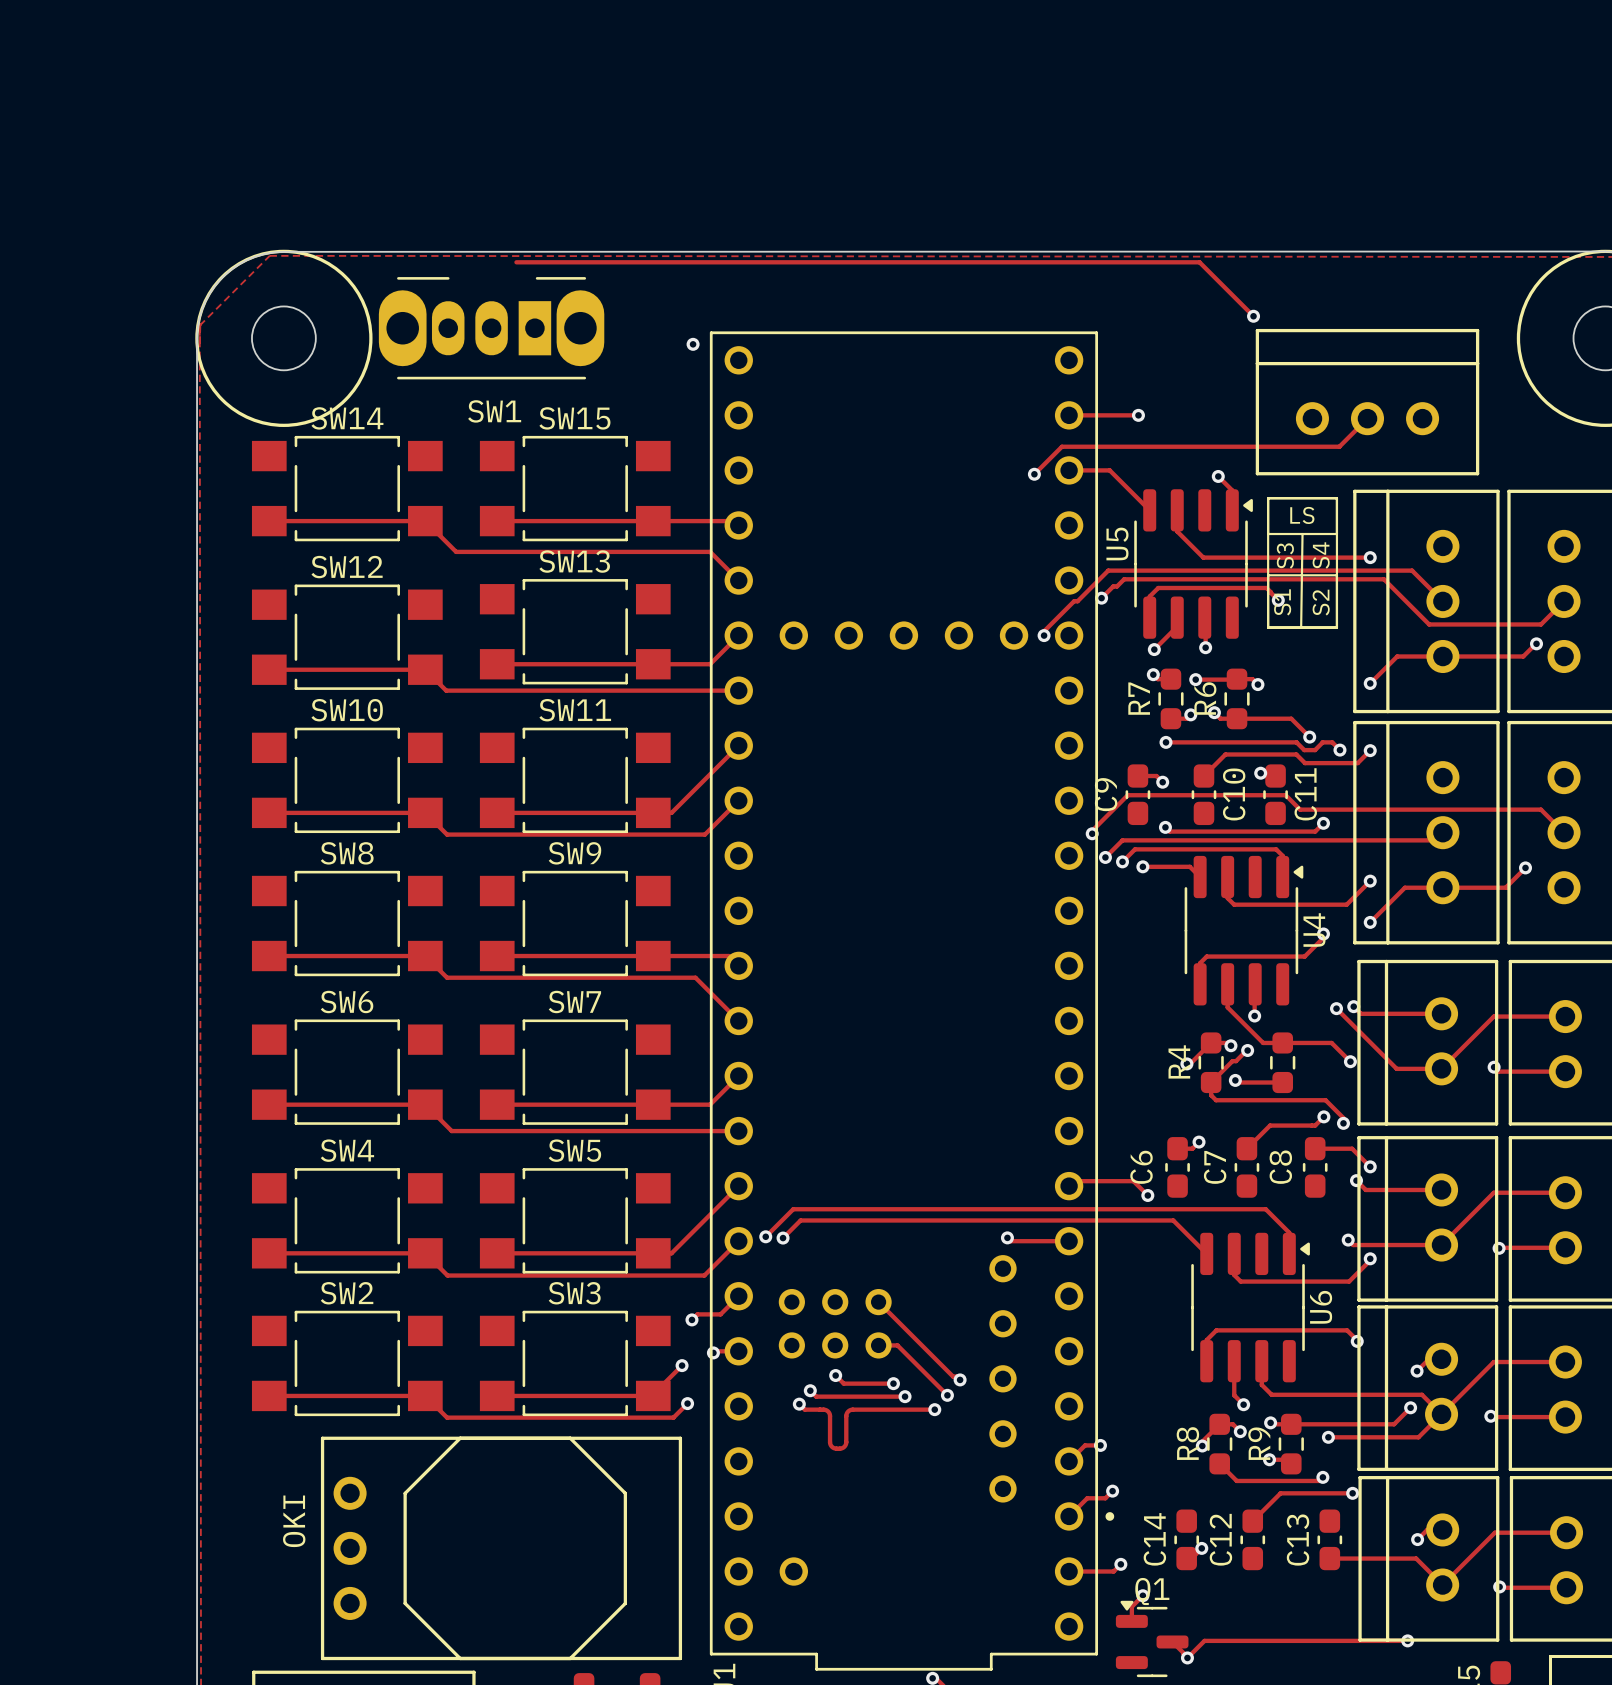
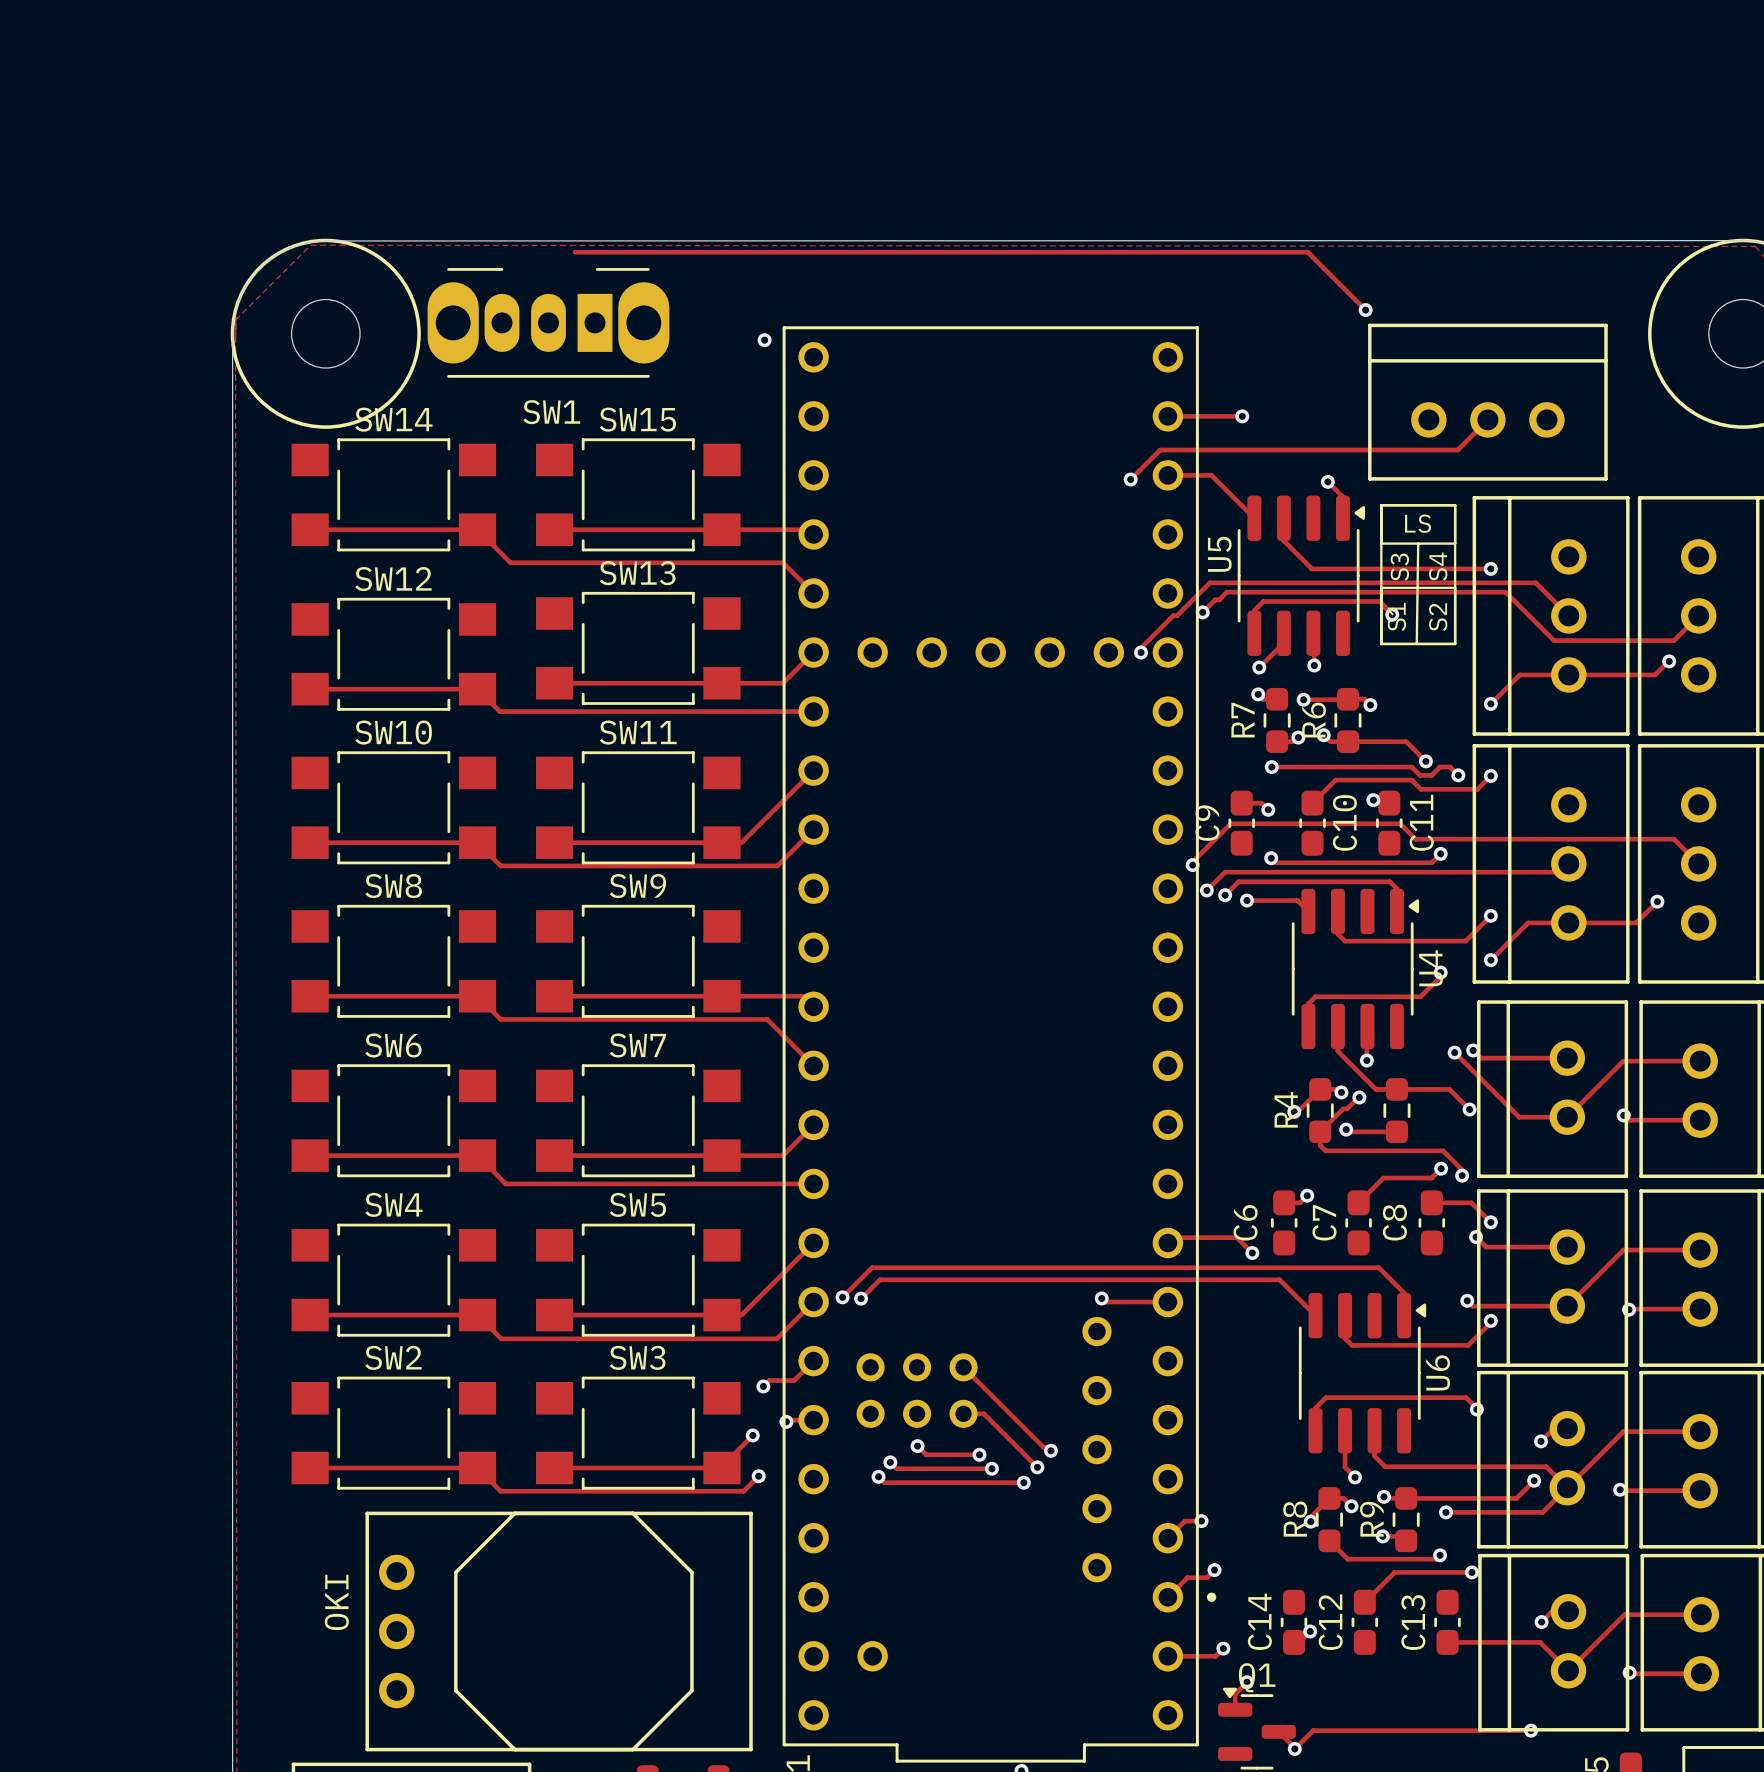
track: (823, 1409) (827, 1410) (829, 1415) (830, 1443) (836, 1448) (842, 1448) (845, 1444) (846, 1414) (852, 1409) -> (904, 1482) (935, 1482)

